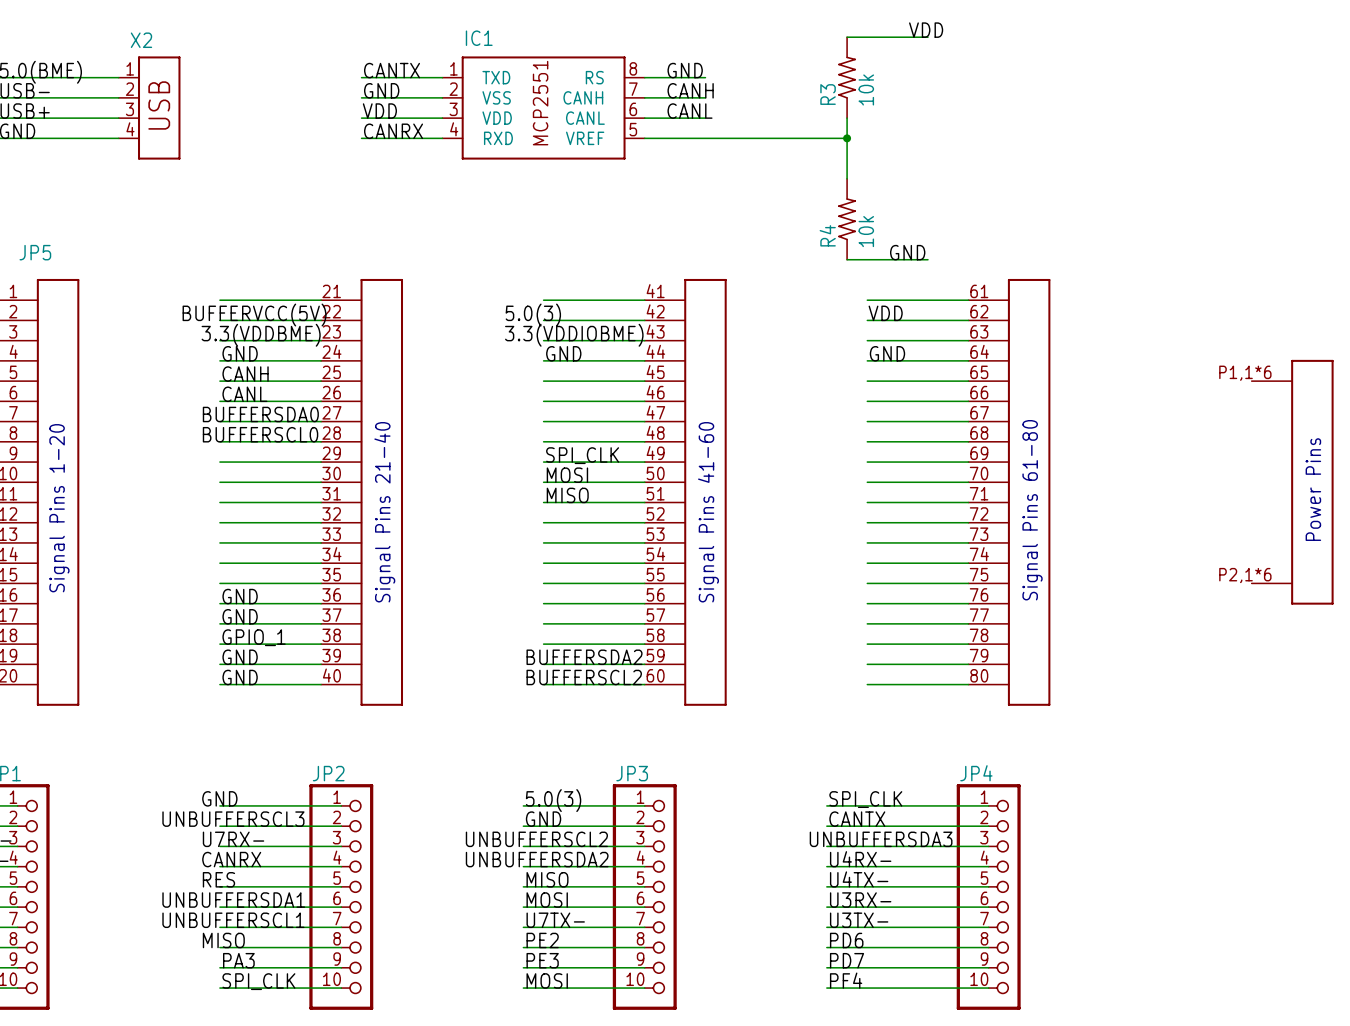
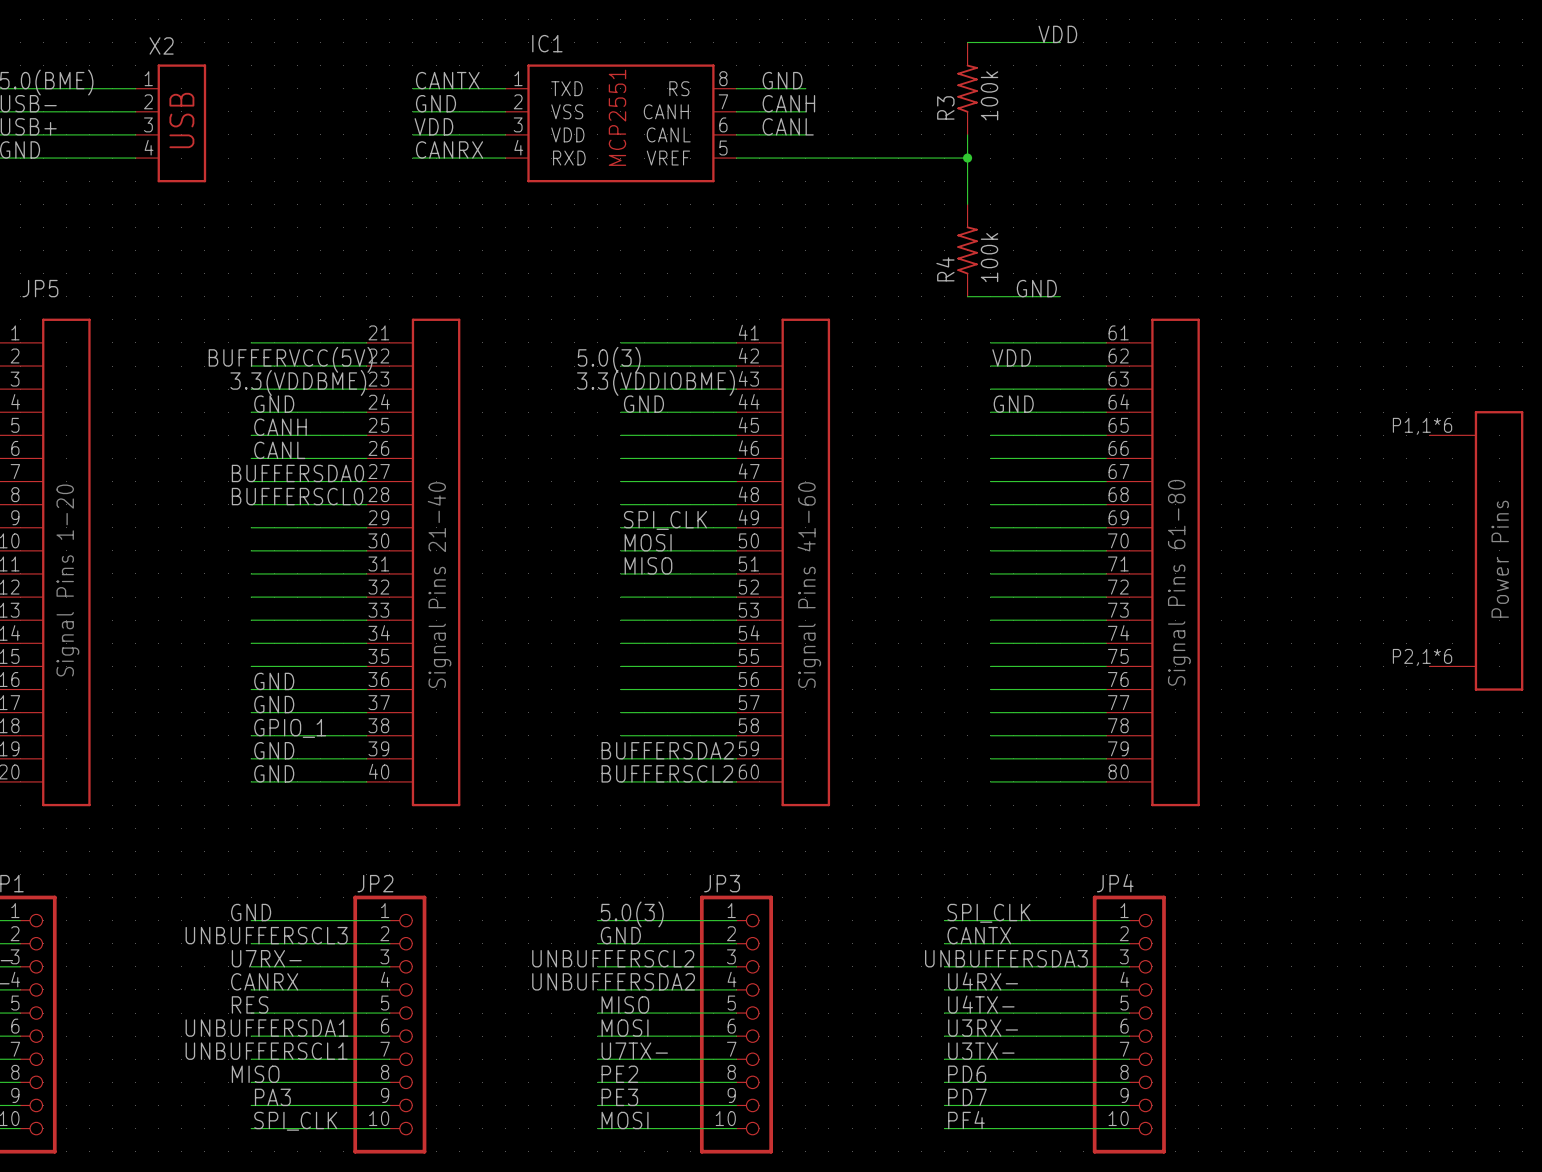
R3 value: 10k (866, 89) -> 100k (989, 95)
R4 value: 10k (866, 231) -> 100k (989, 257)

